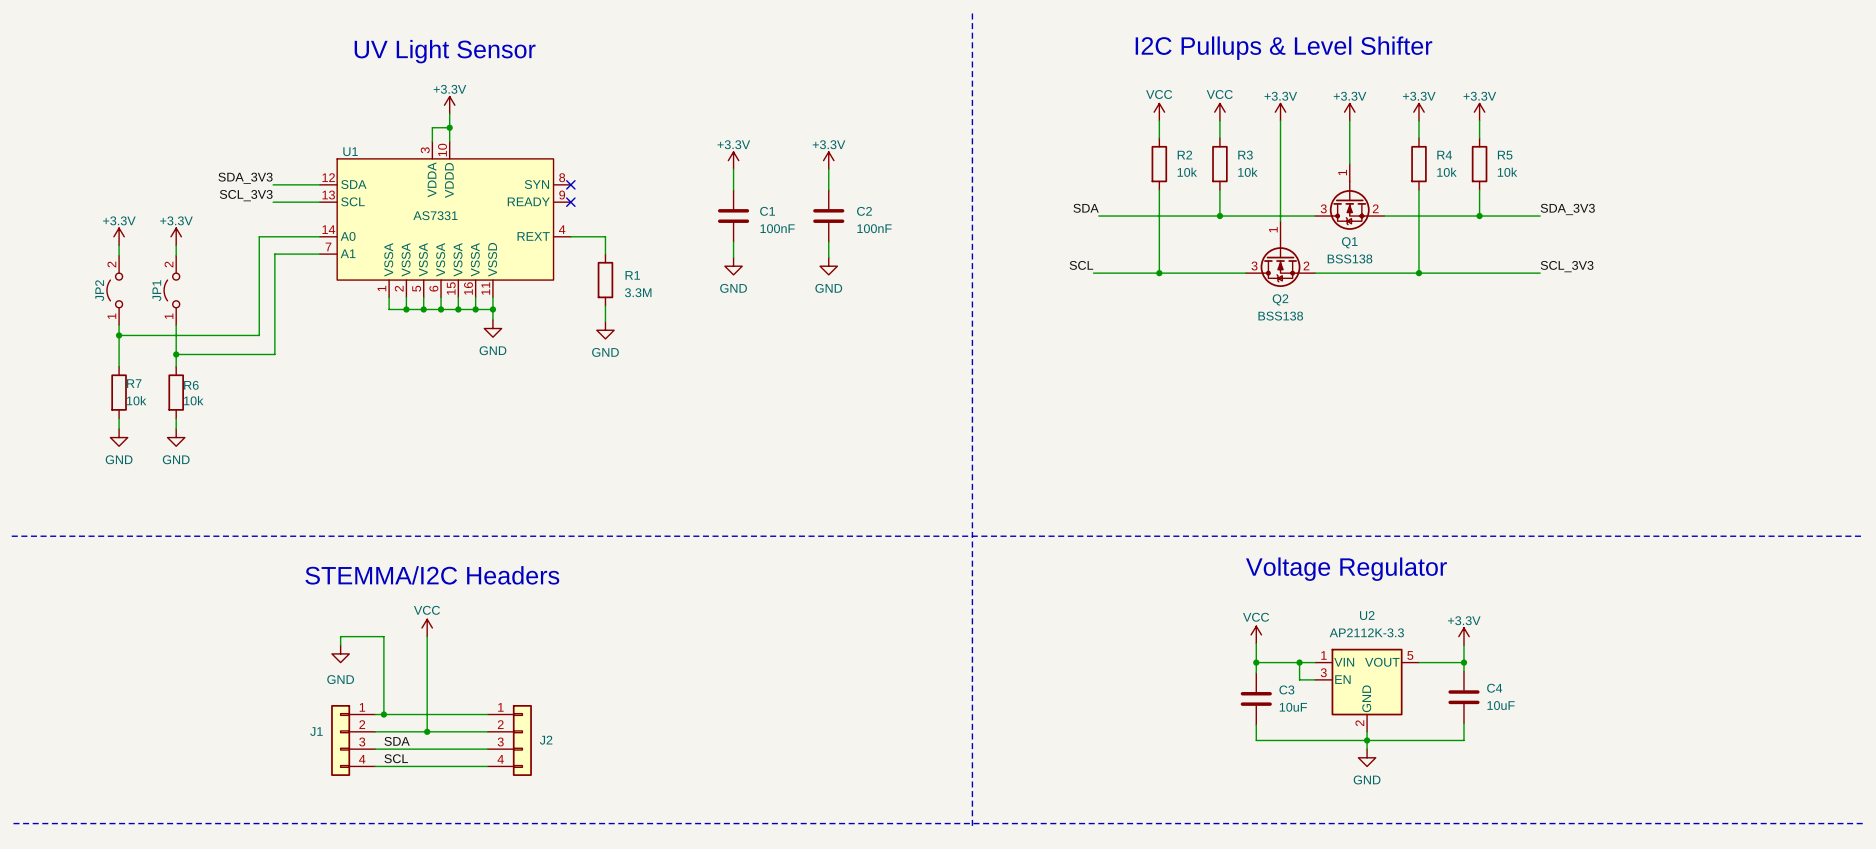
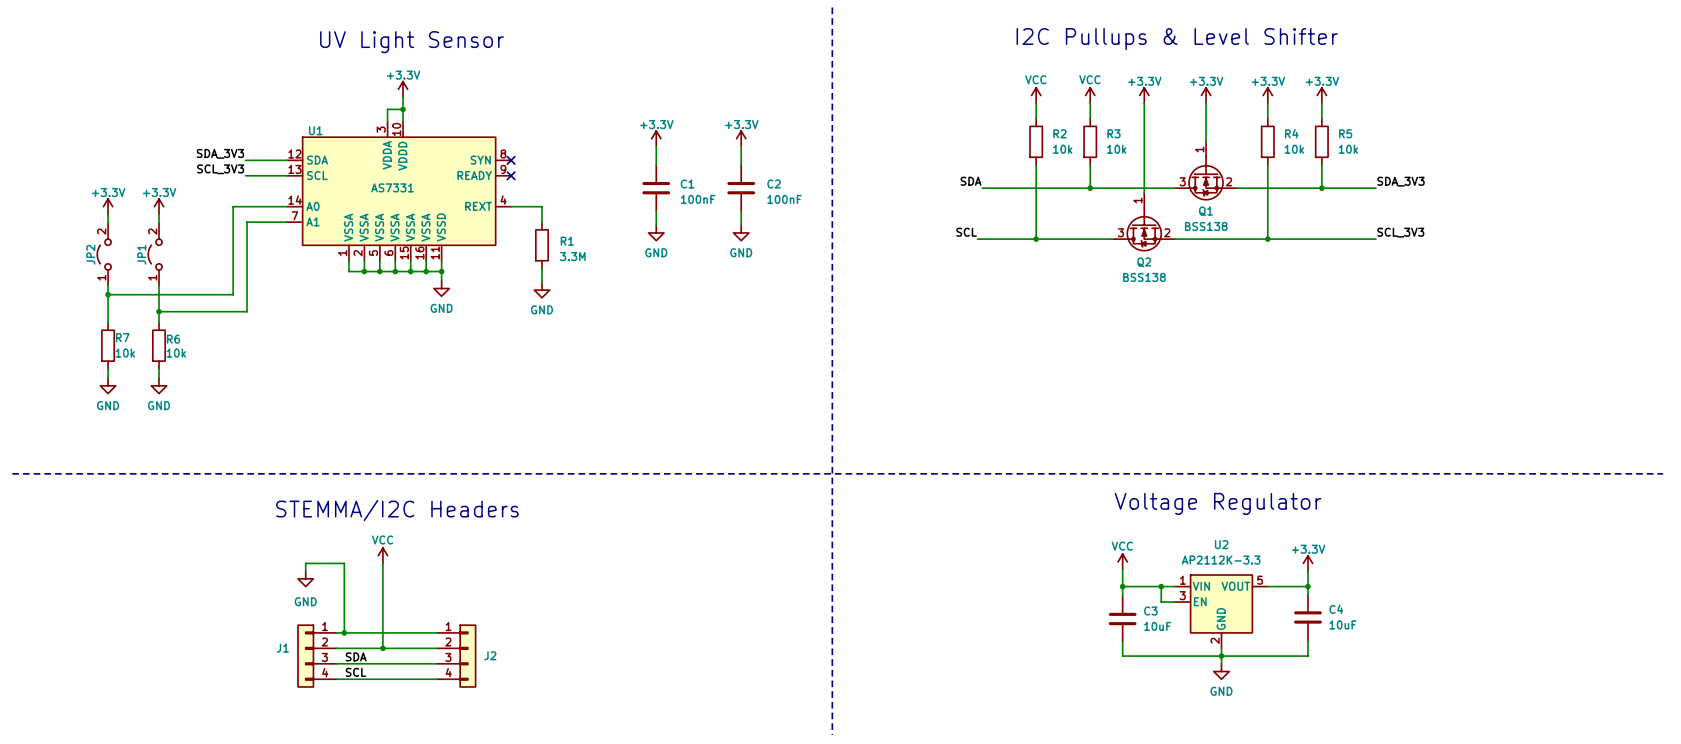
line: none -> (832, 7) (832, 734)
line: (972, 13) (972, 827) -> none
line: (13, 823) (1863, 823) -> none

